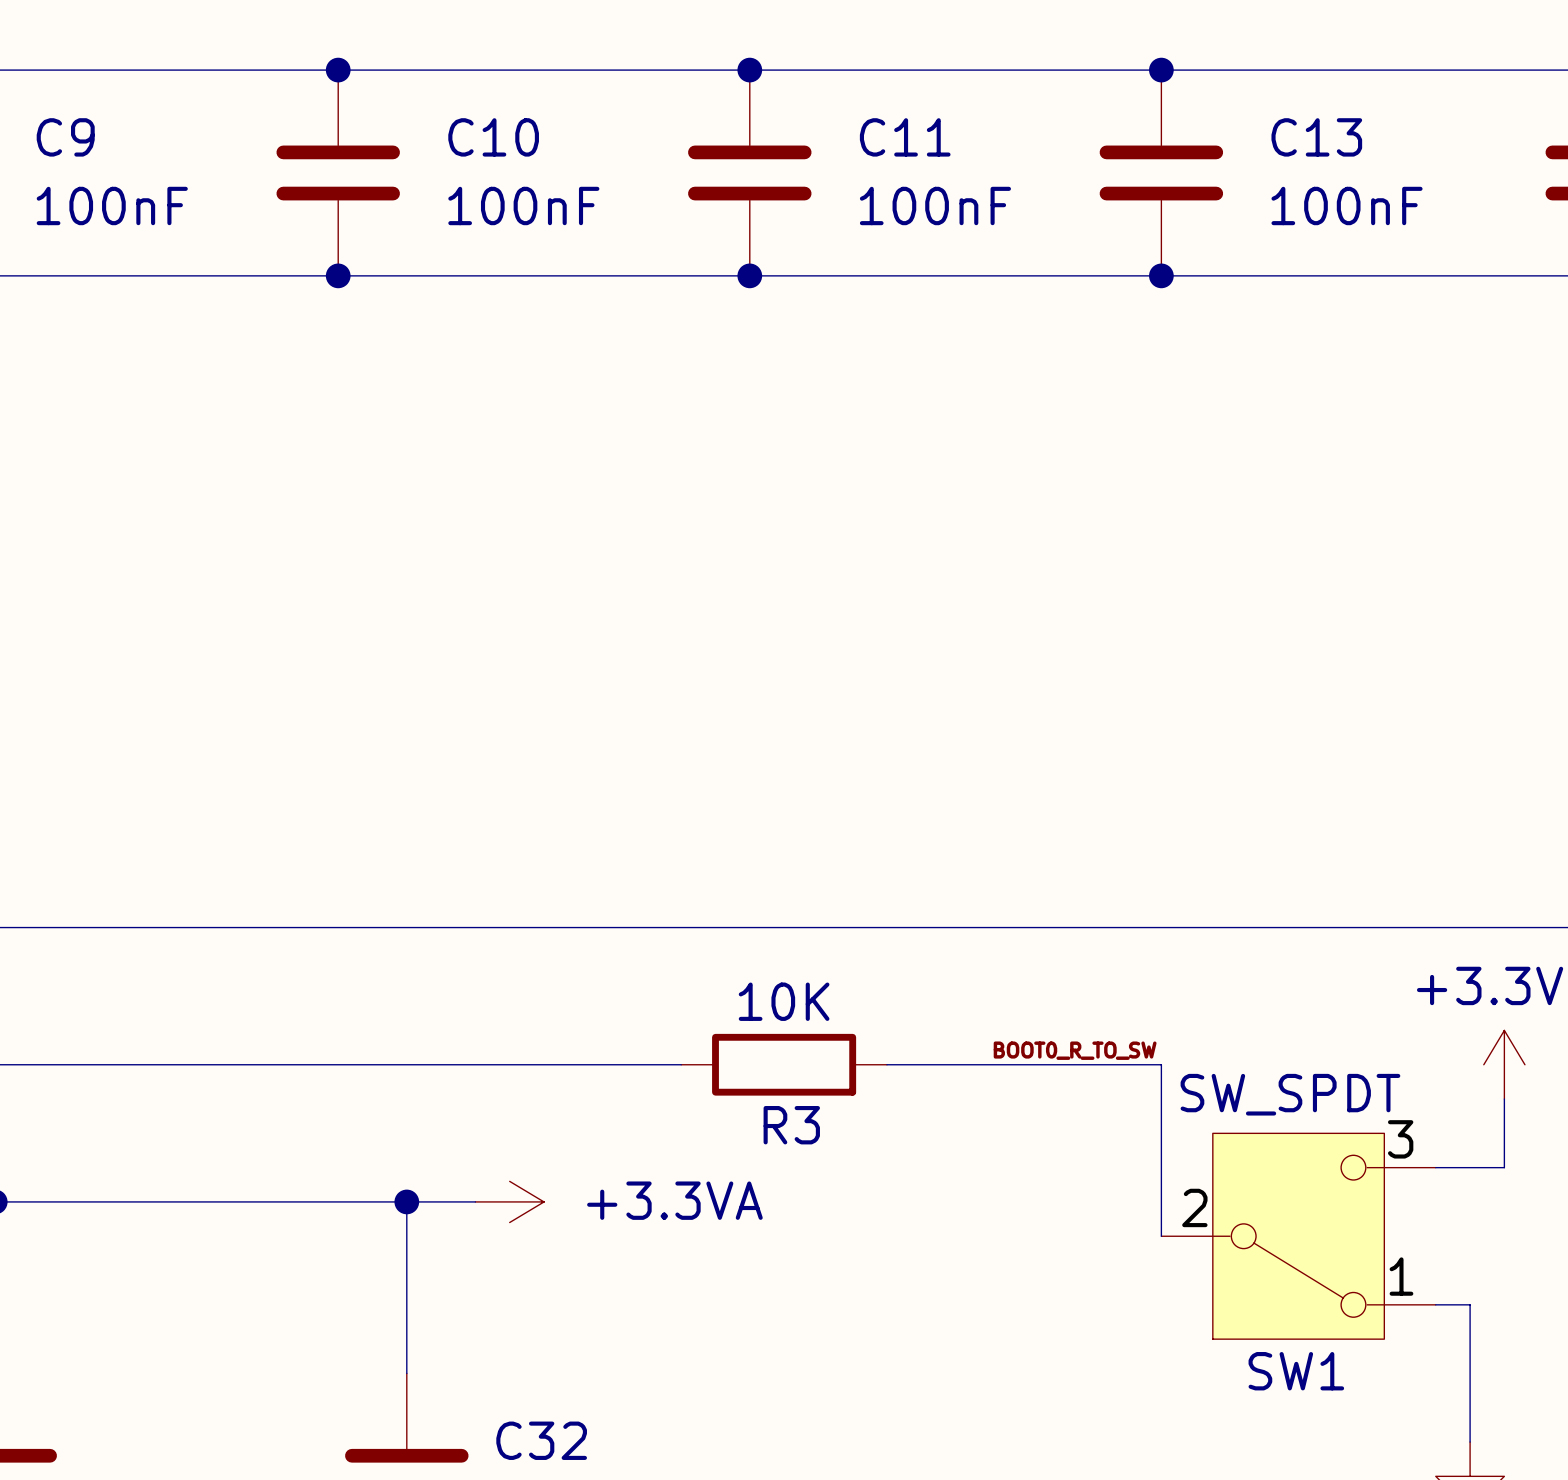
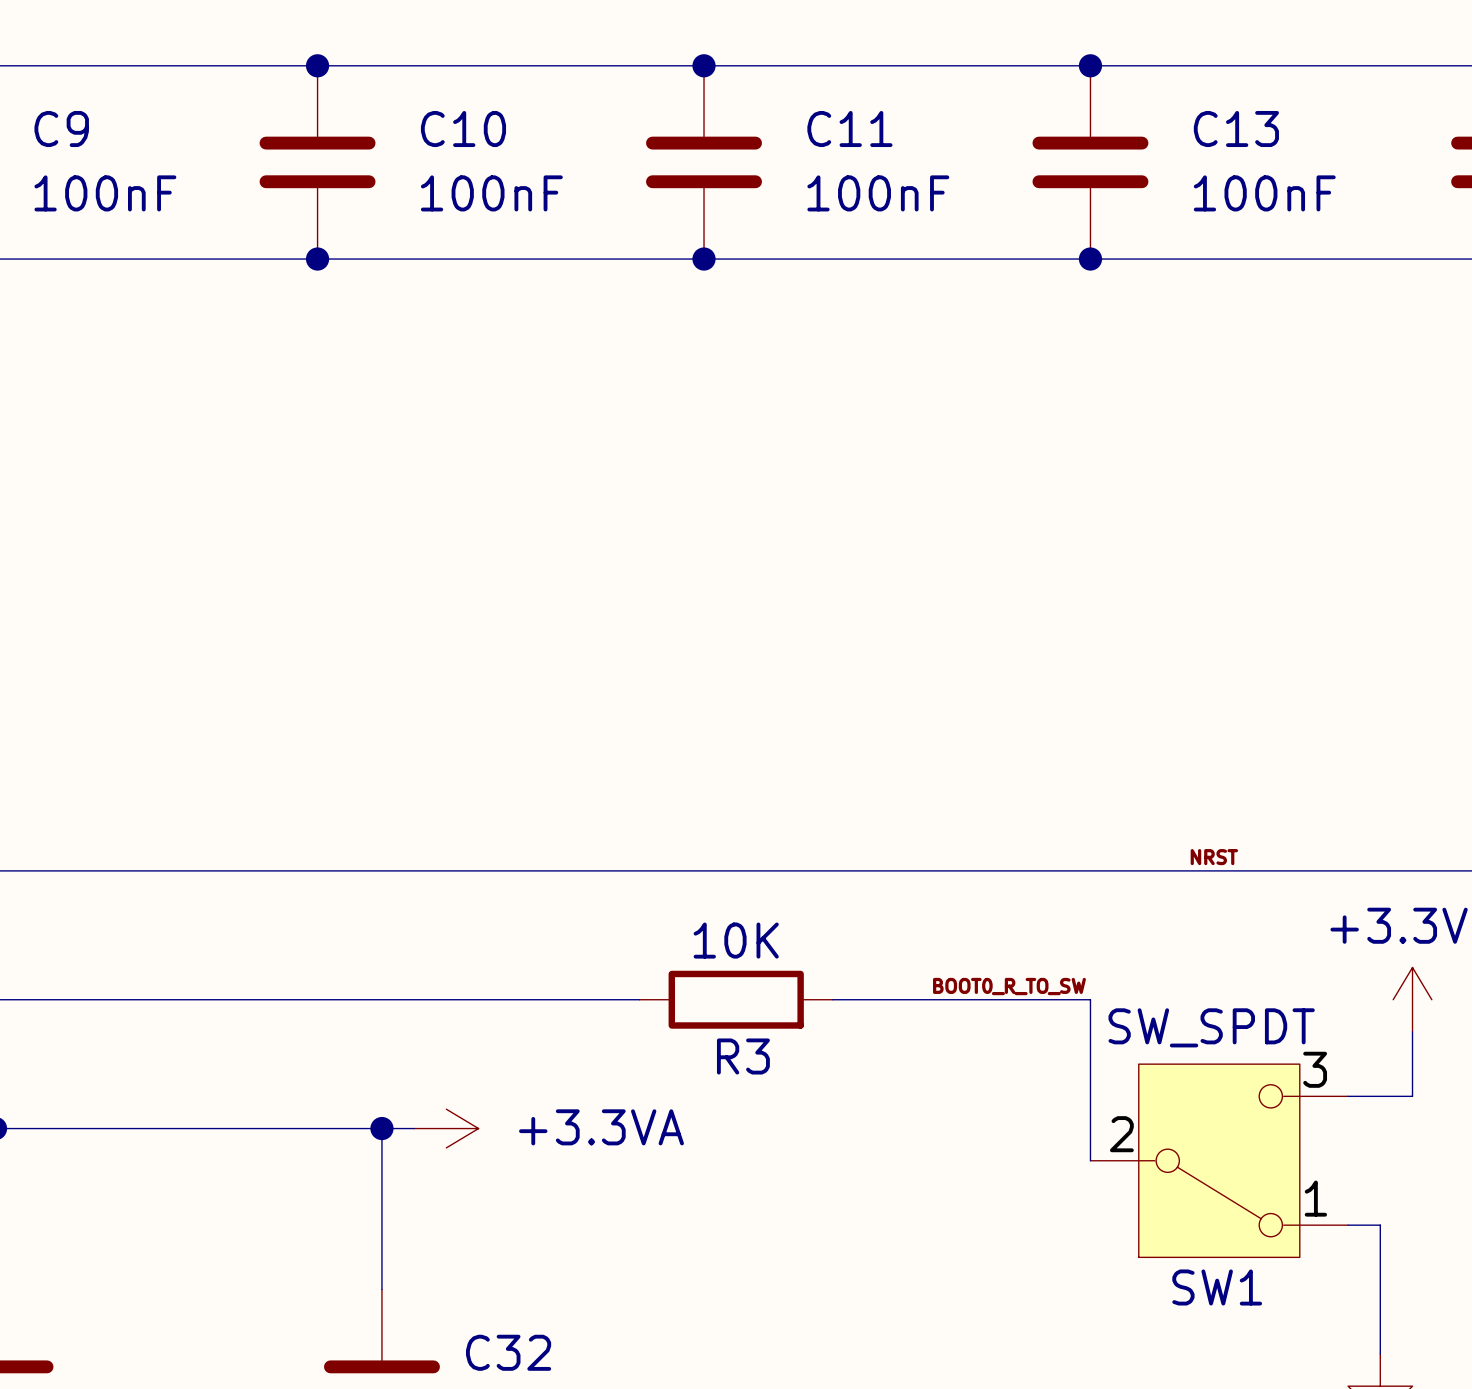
label: none -> NRST (1214, 857)
power symbol position: +3.3VA (509, 1201) -> +3.3VA (446, 1128)

